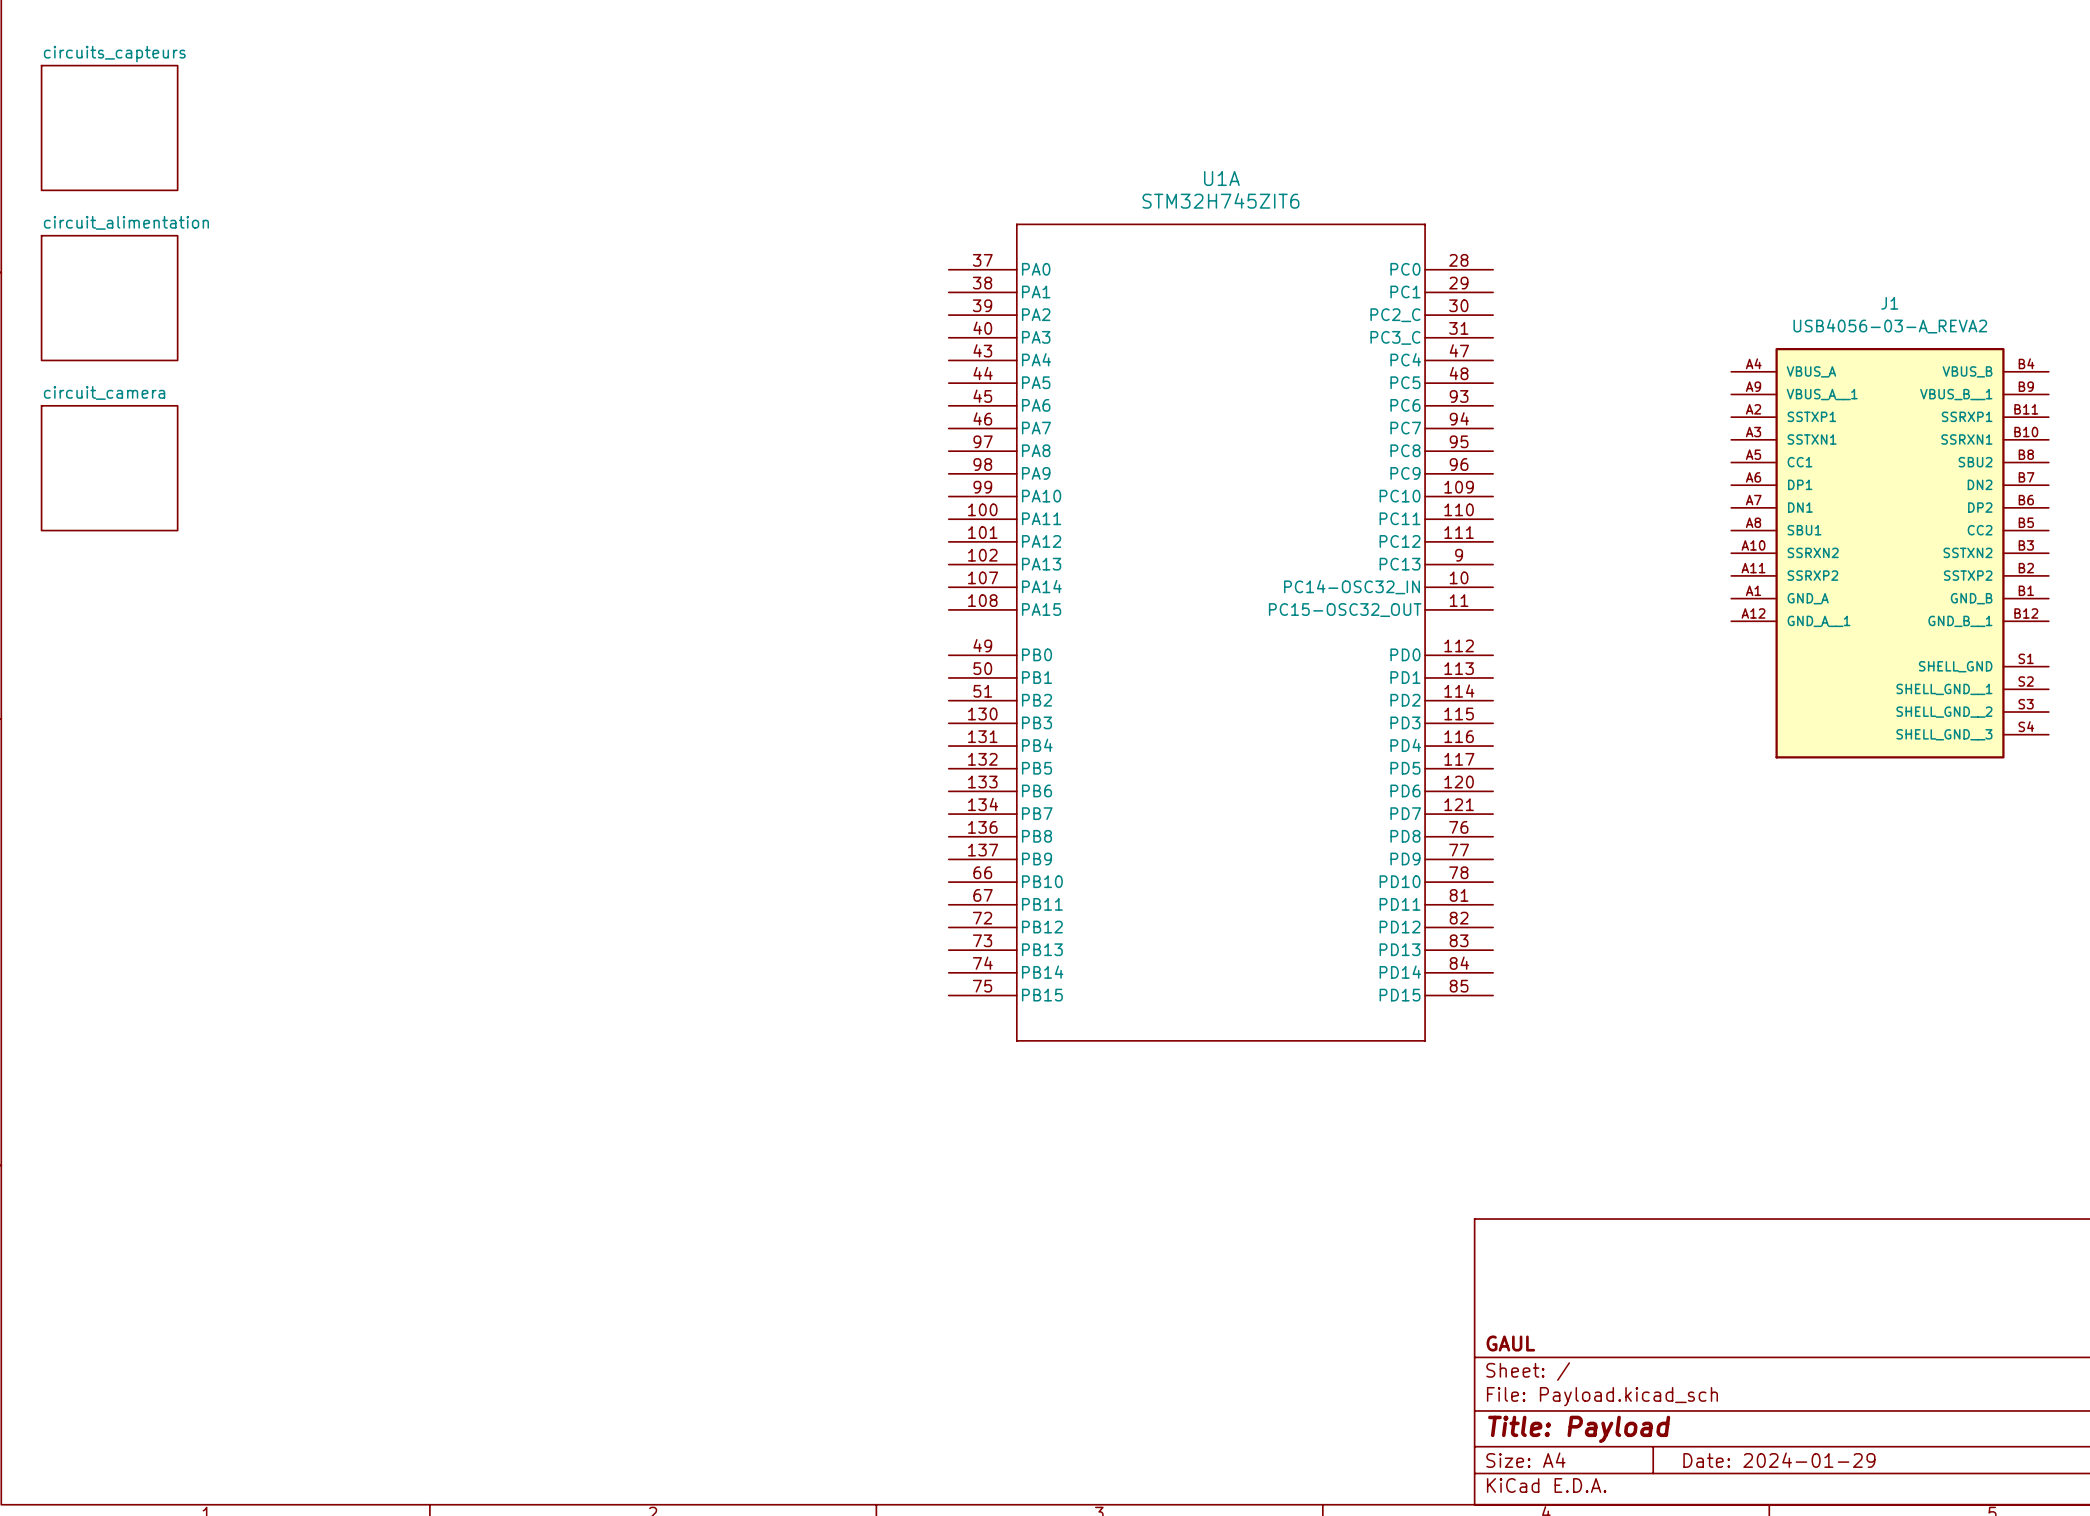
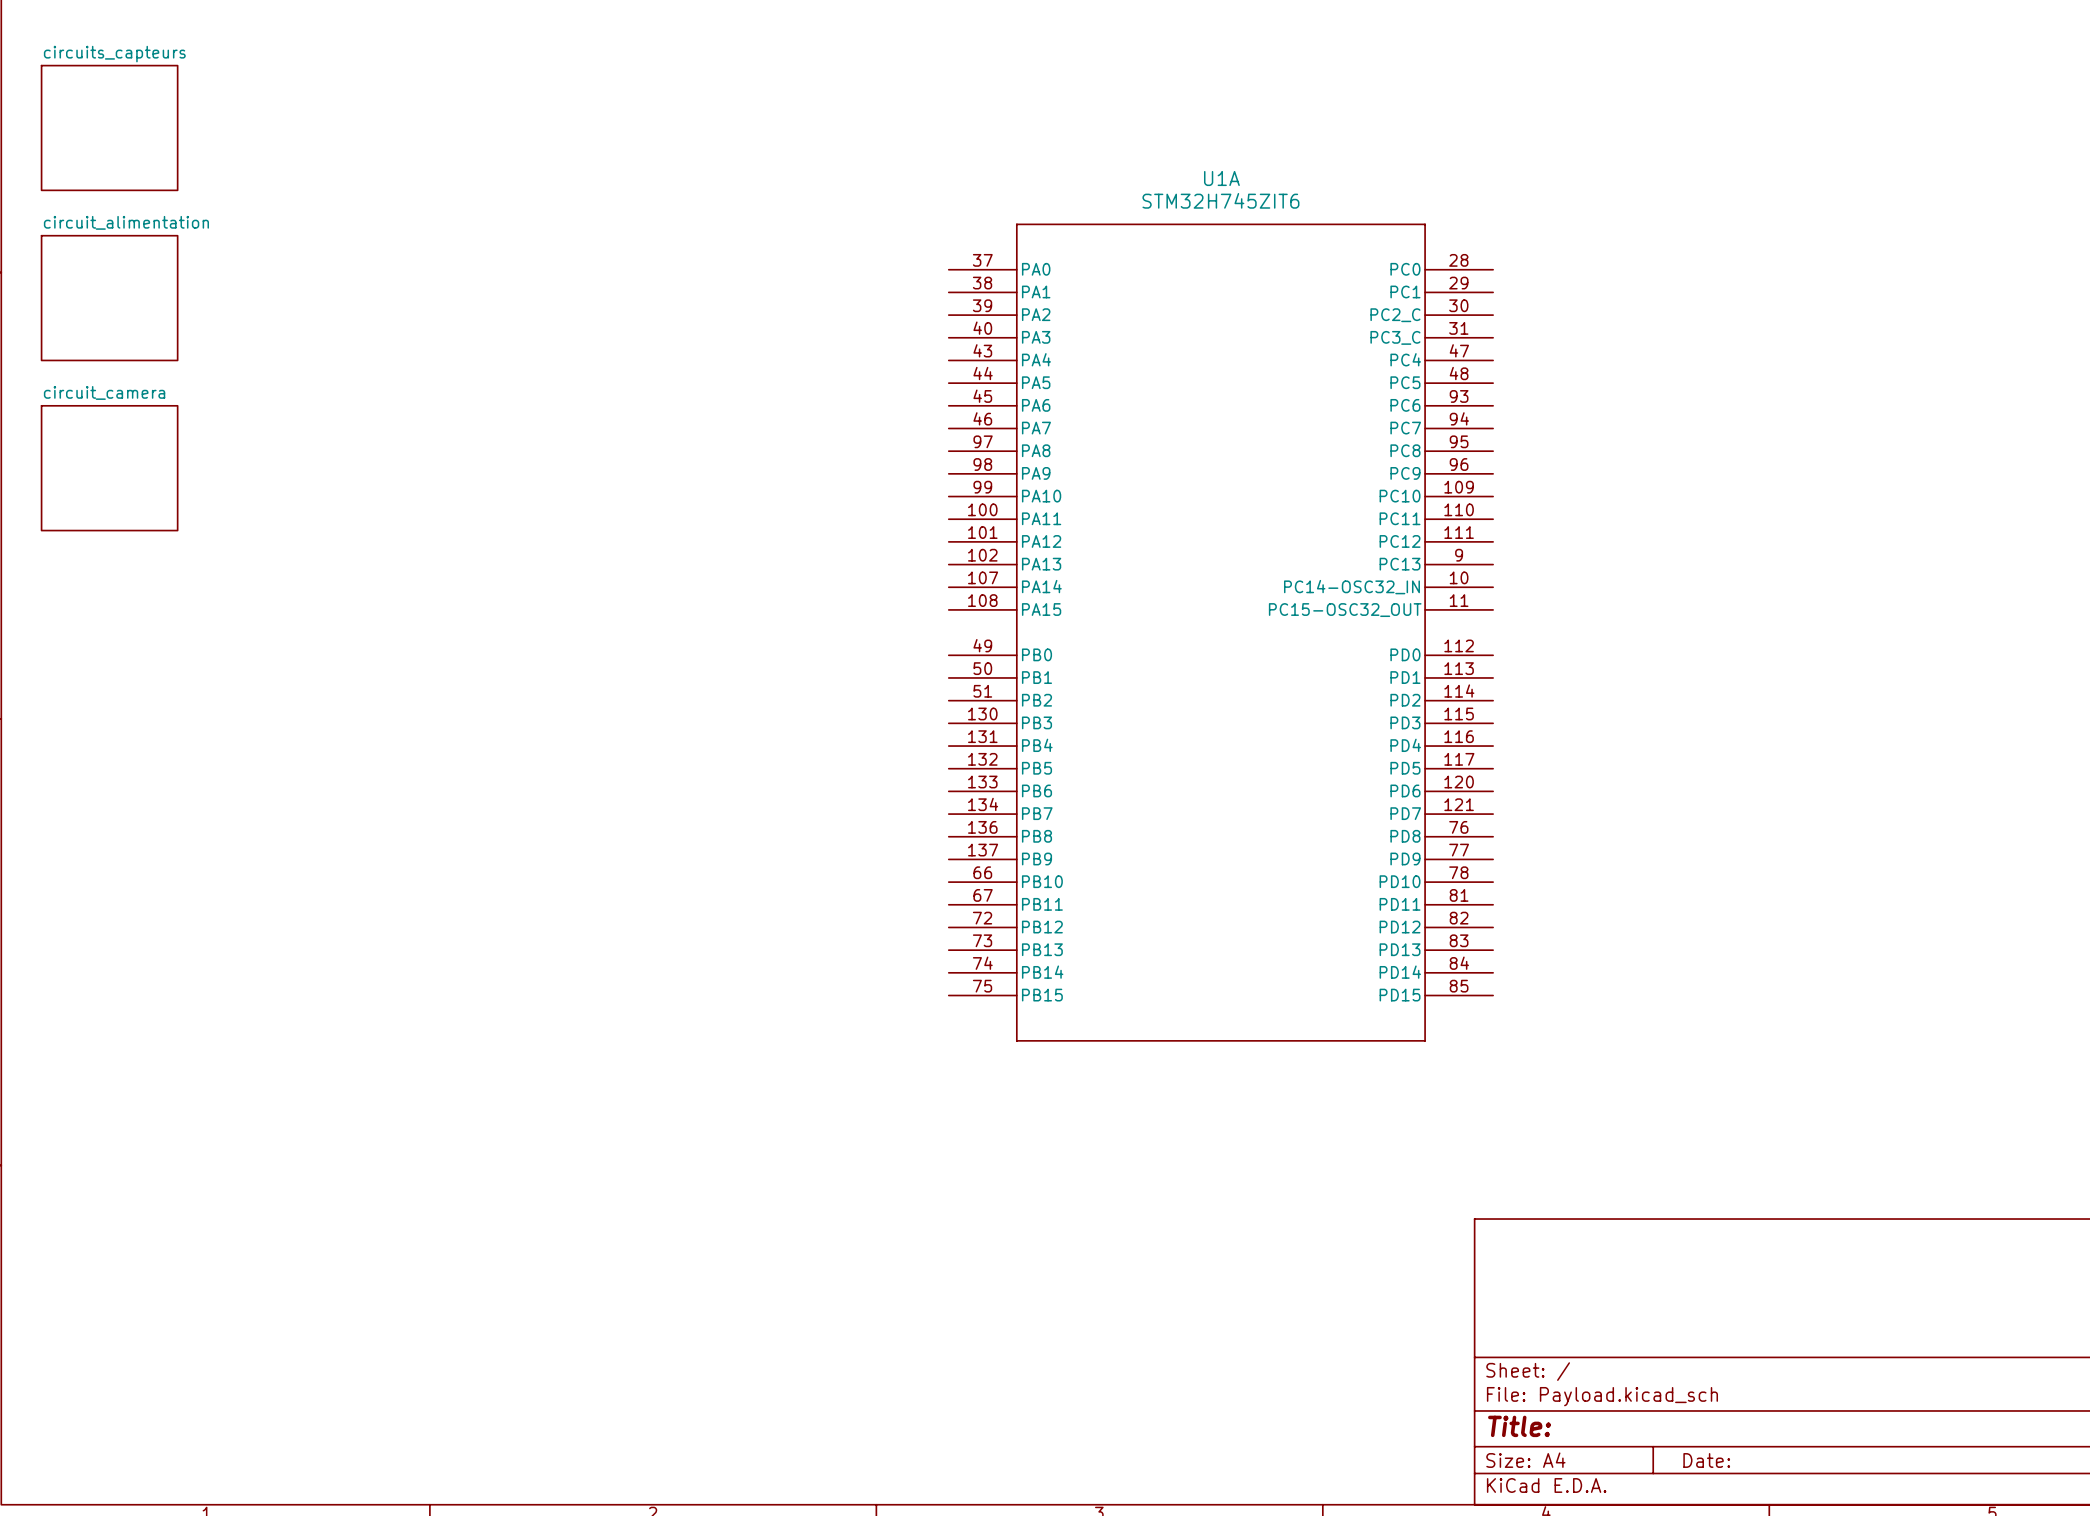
J1: USB4056-03-A_REVA2 (1890, 553) -> none
title block: GAUL (1510, 1343) -> none
title block: Title: Payload (1579, 1429) -> Title: (1519, 1426)
title block: Date: 2024-01-29 (1779, 1460) -> Date: (1706, 1460)

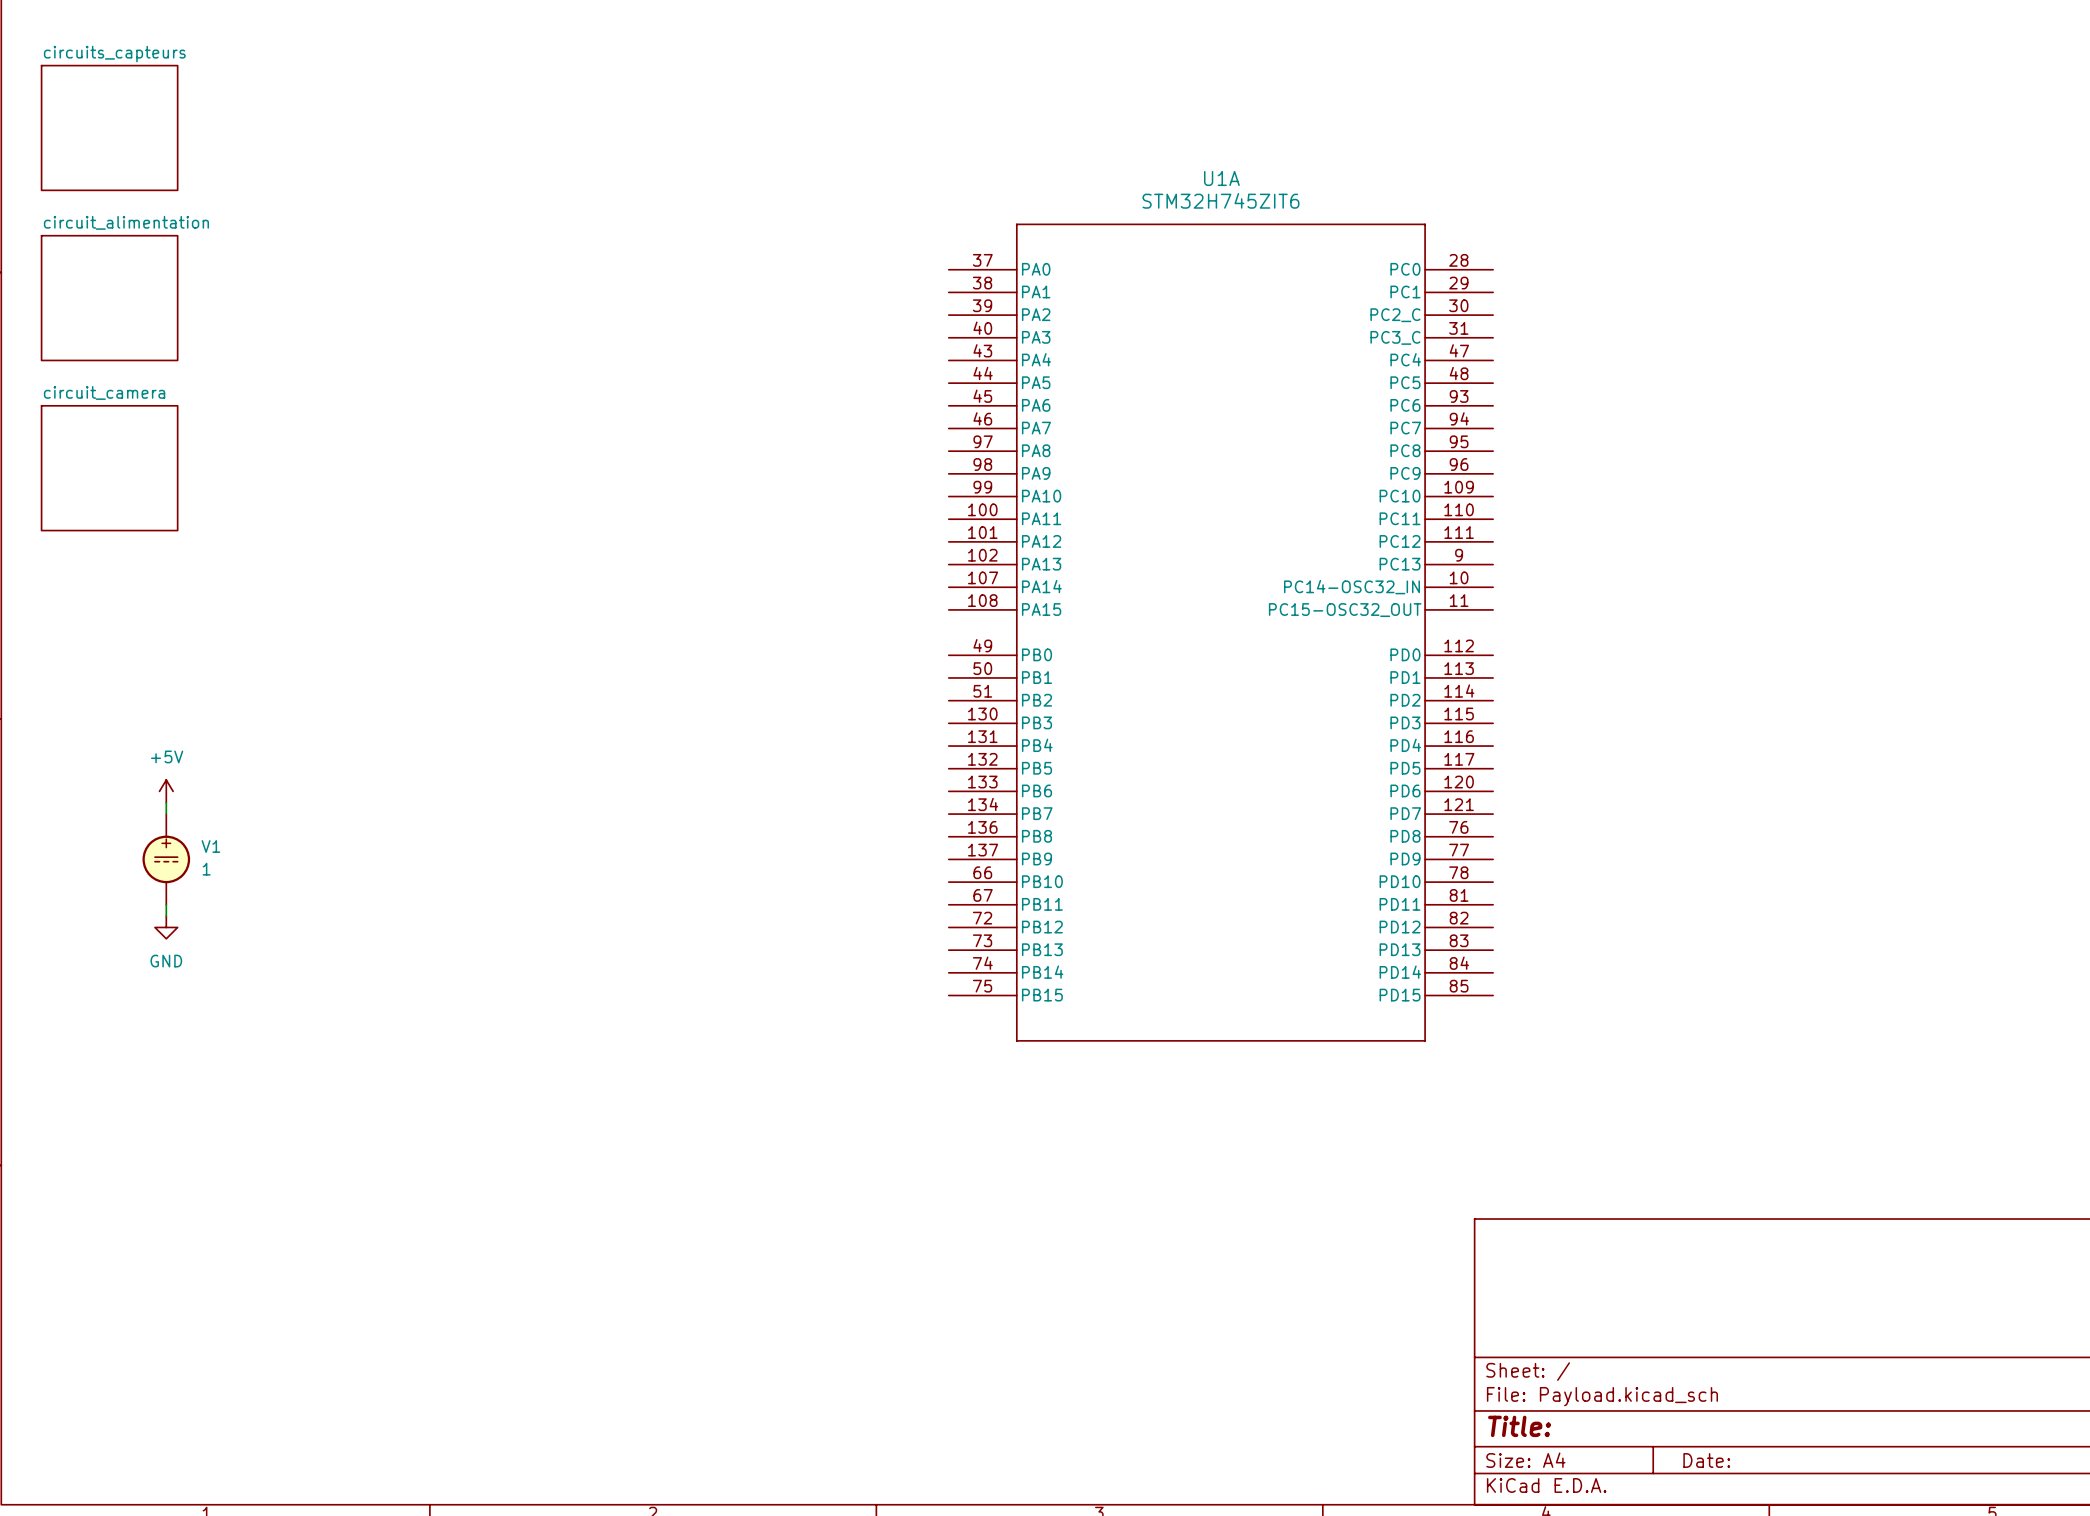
power symbol: none -> +5V (166, 791)
wire: none -> (166, 802) (166, 814)
V1: none -> 1 (166, 859)
wire: none -> (166, 904) (166, 916)
power symbol: none -> GND (166, 927)

